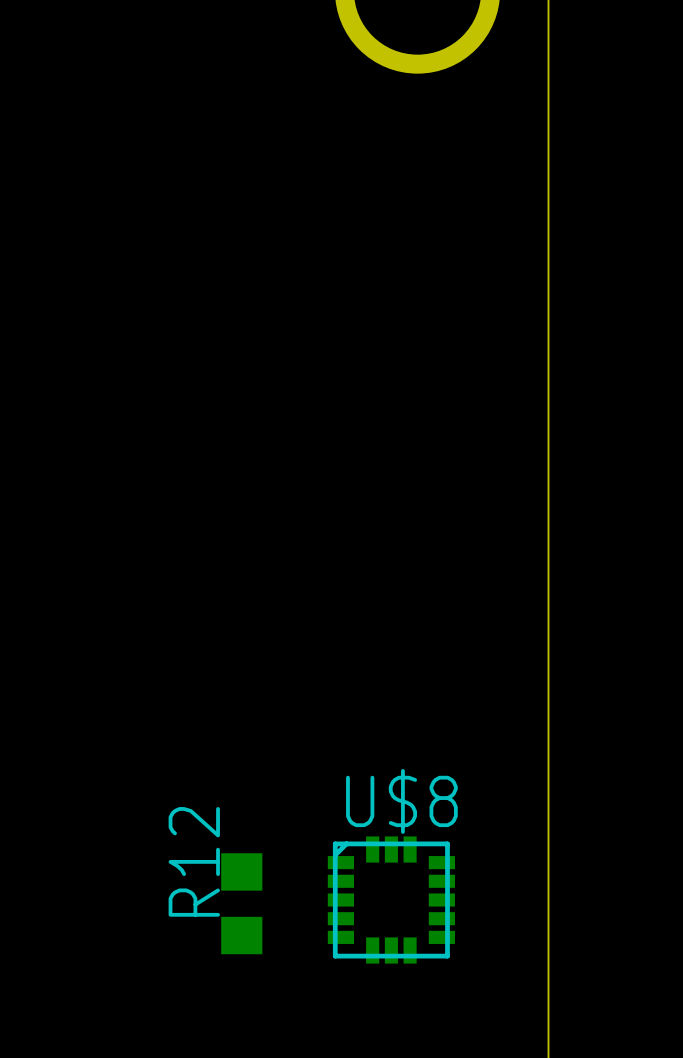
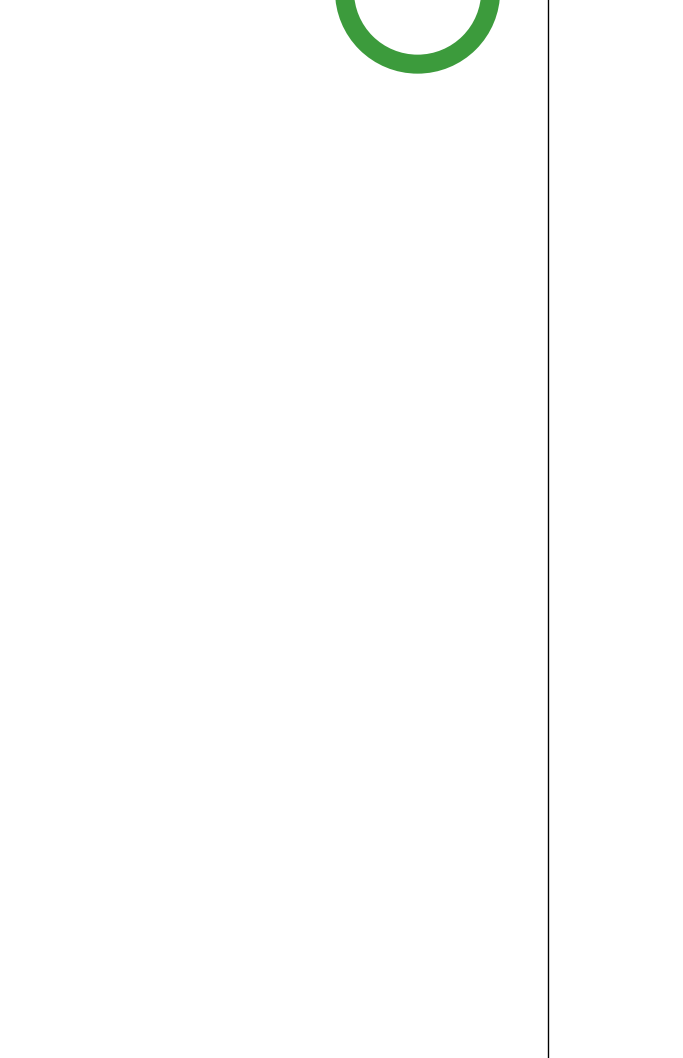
U$8: (391, 900) -> none
R12: (241, 903) -> none

